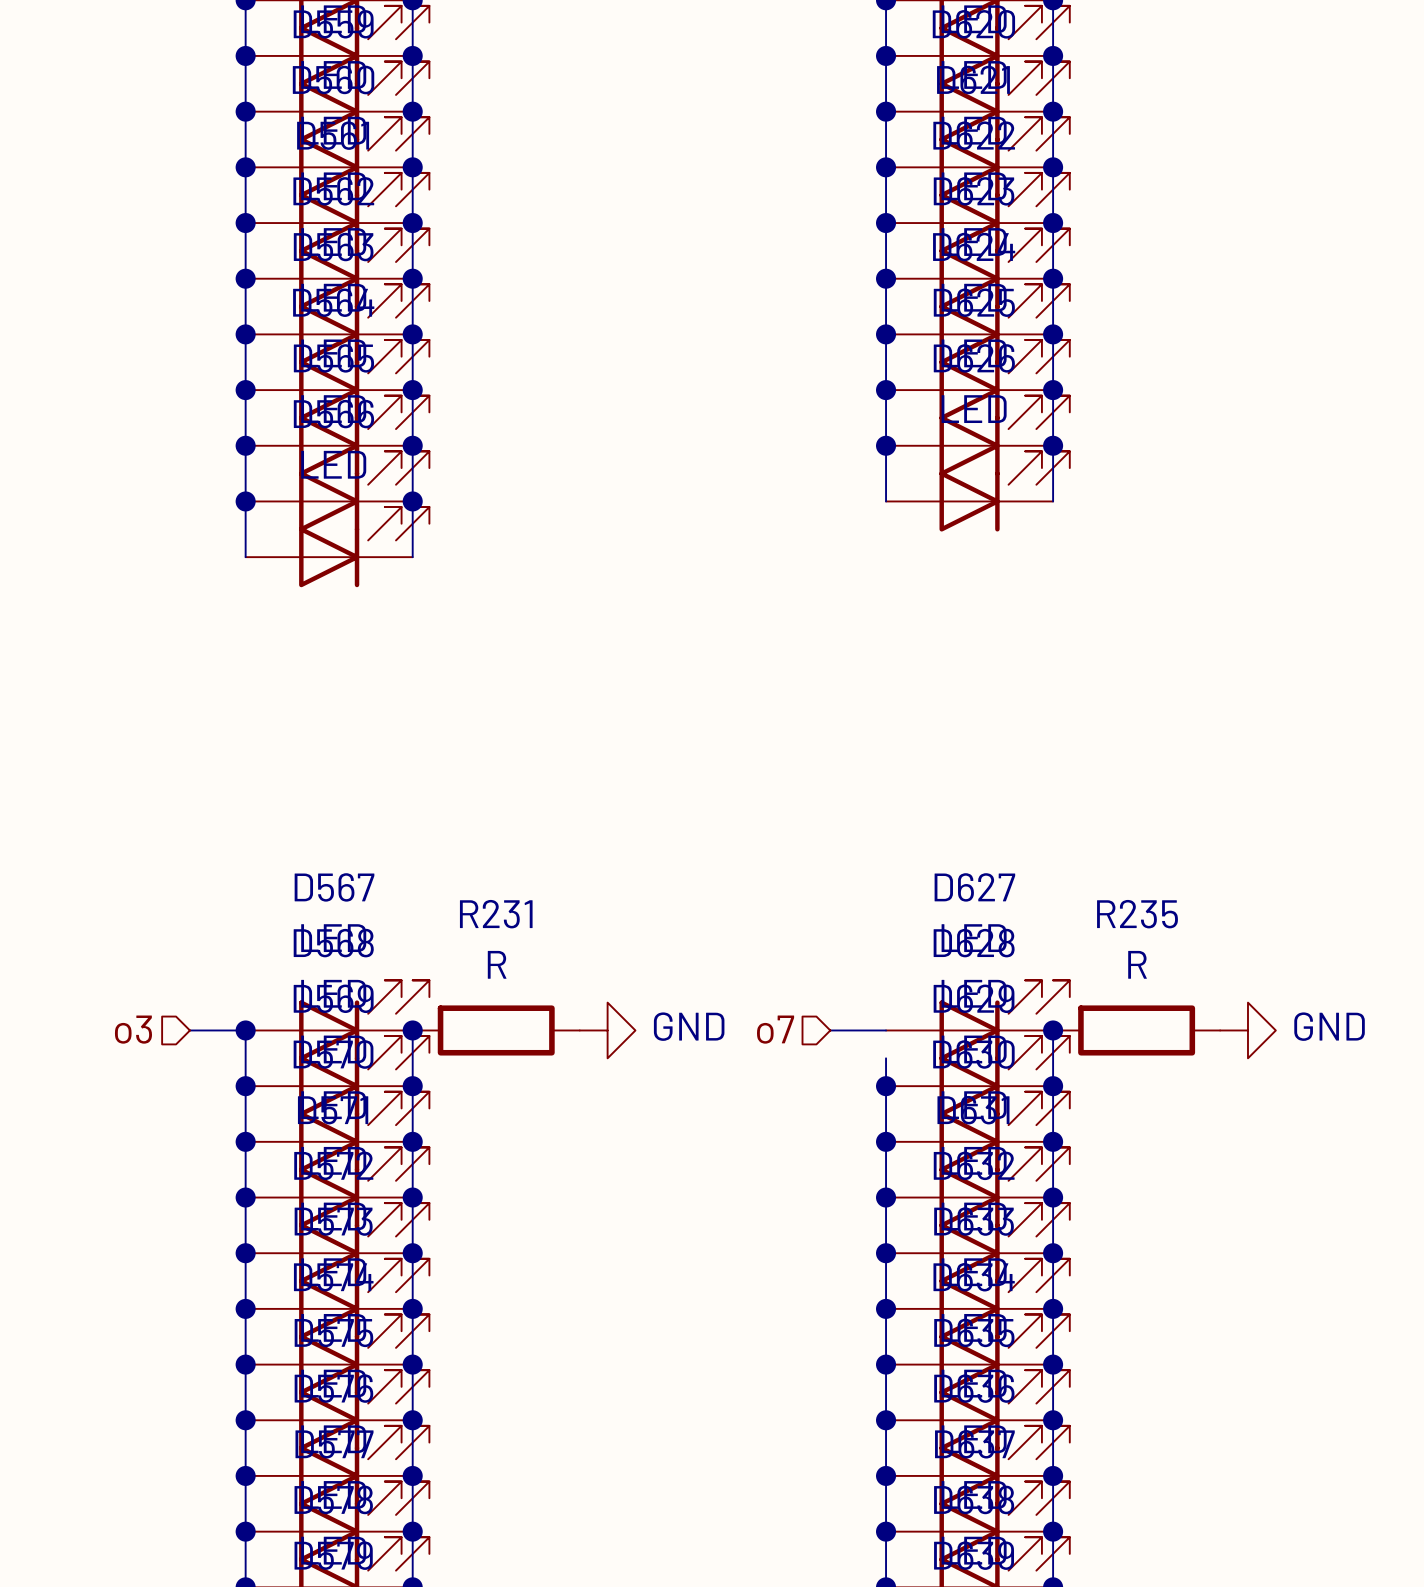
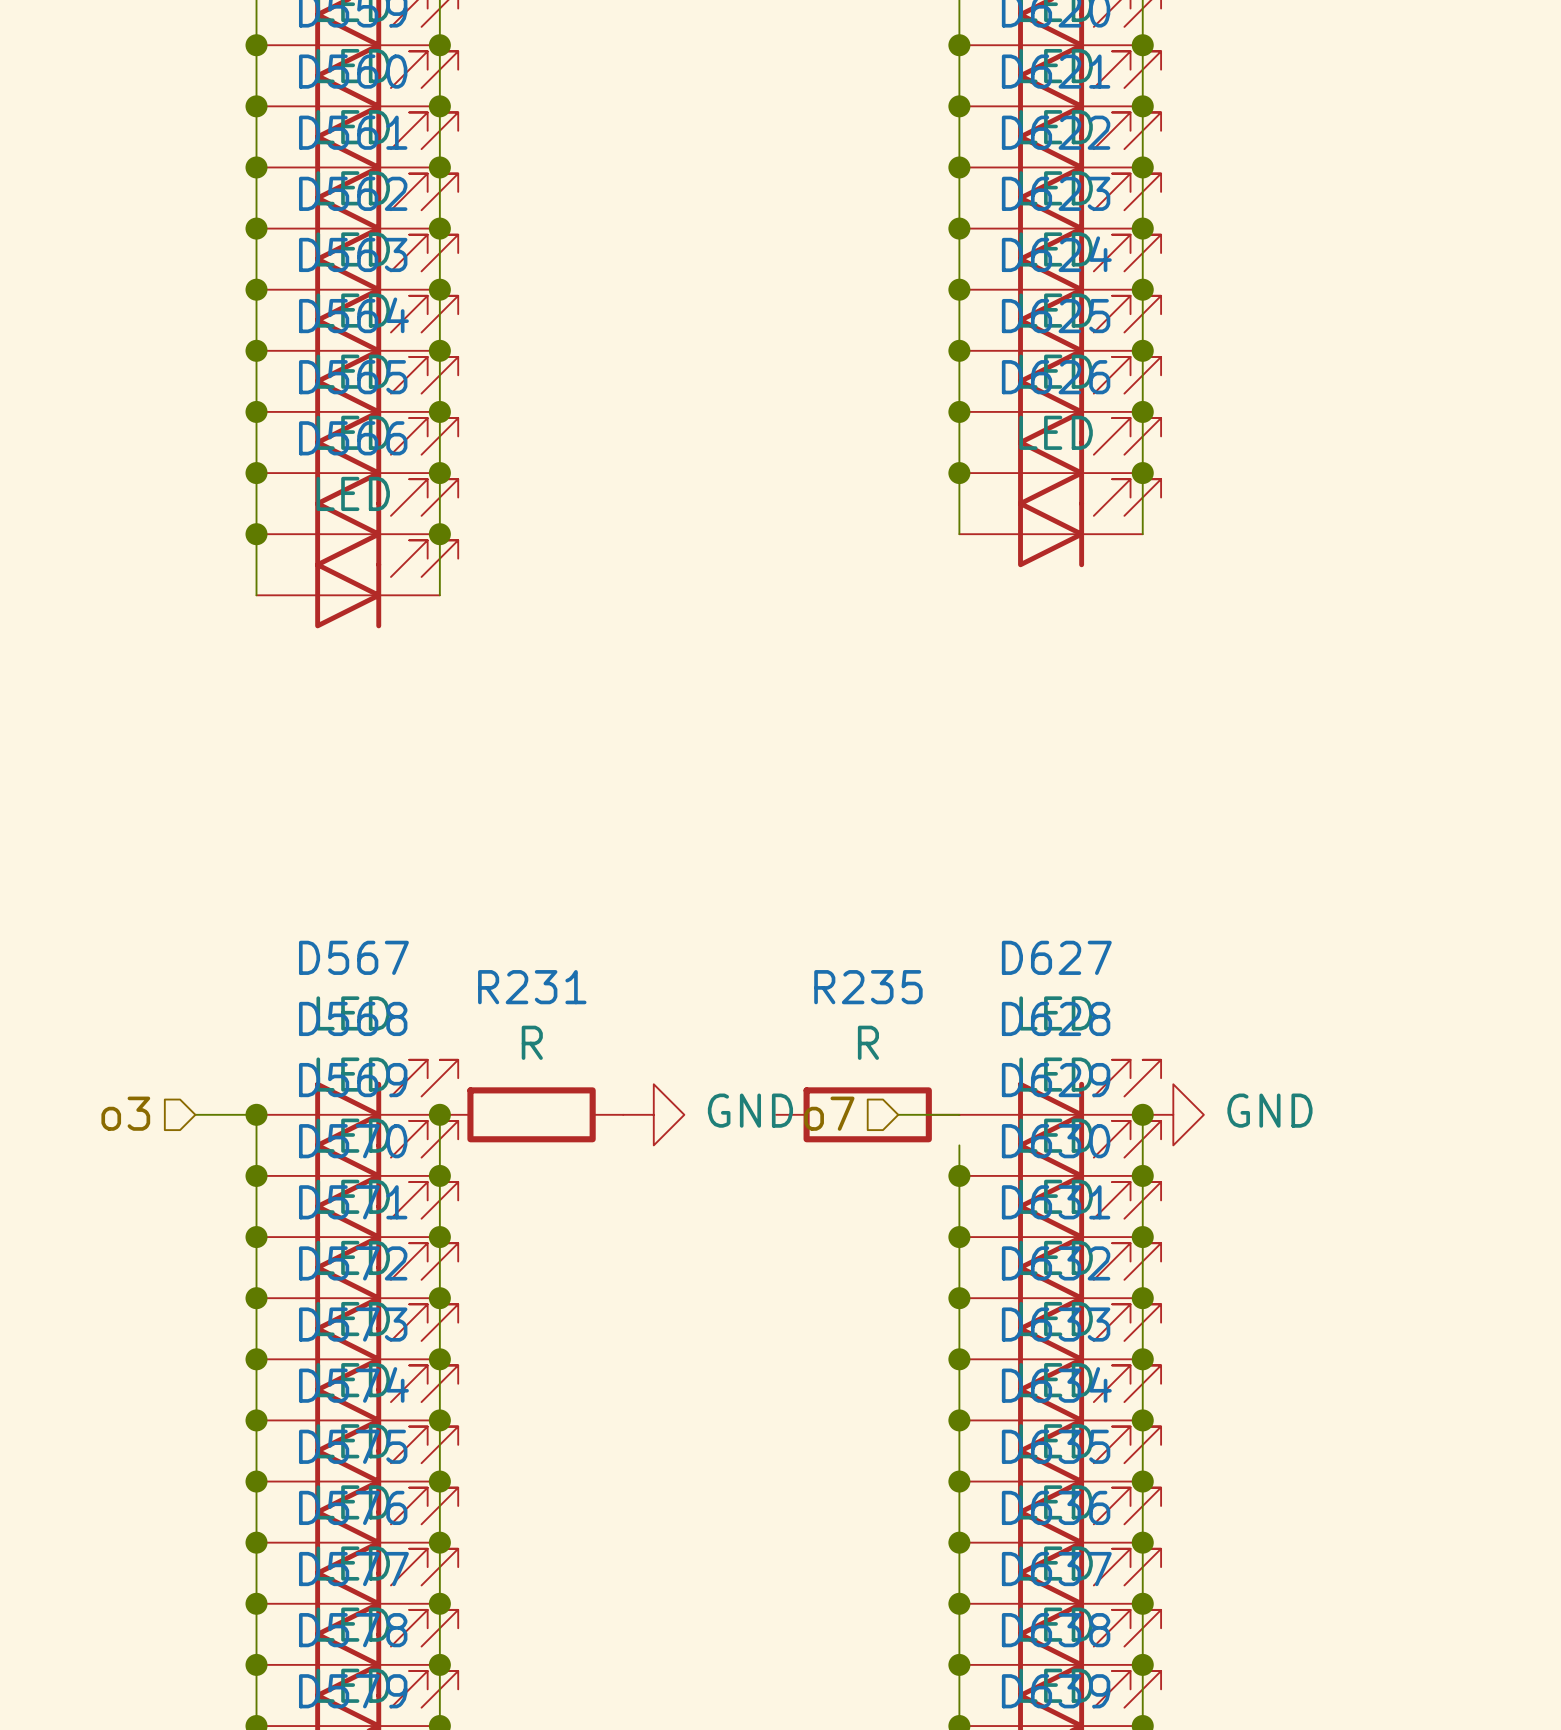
R235 position: (1136, 1030) -> (867, 1114)
power symbol position: GND (1247, 1030) -> GND (1173, 1114)

